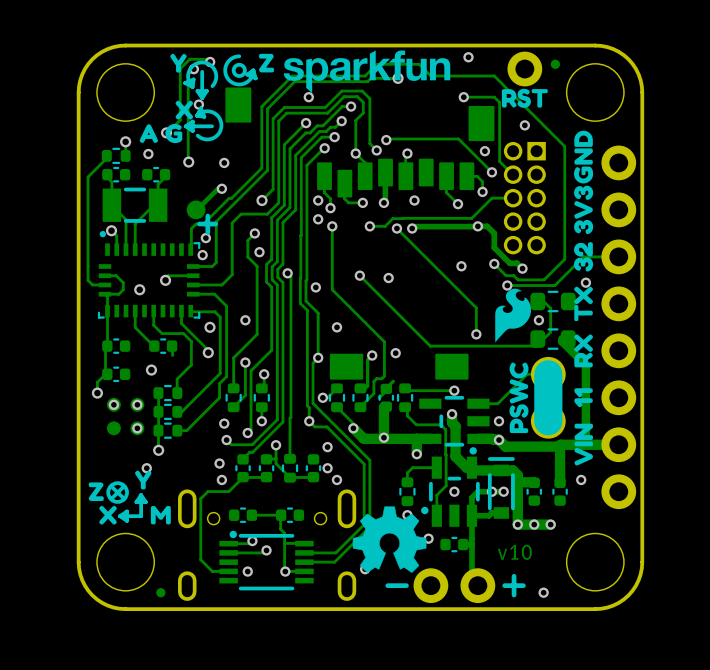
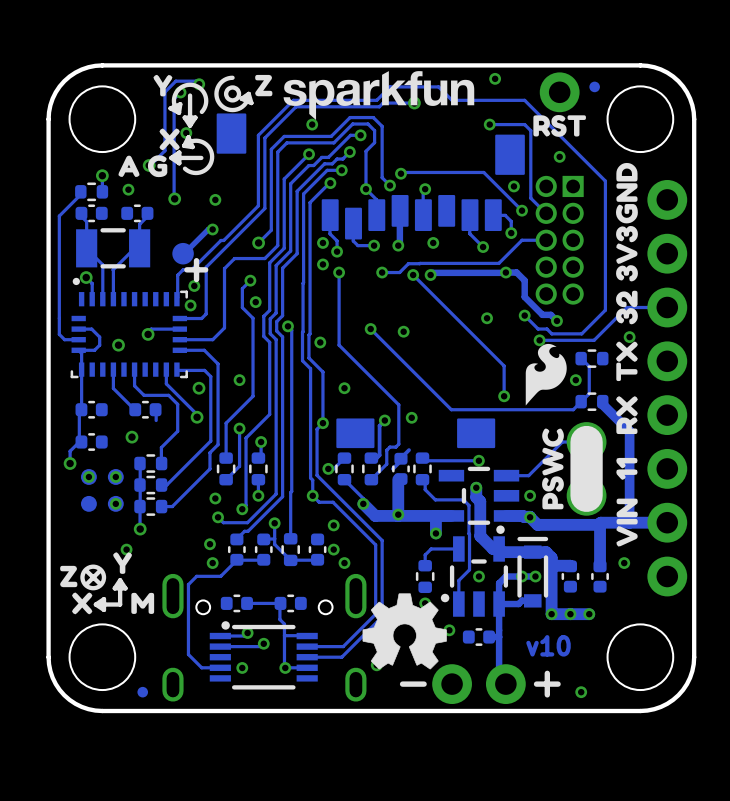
part footprint: [530, 290, 576, 313] -> [575, 349, 609, 368]
part footprint: [530, 328, 576, 350] -> [575, 392, 609, 411]

